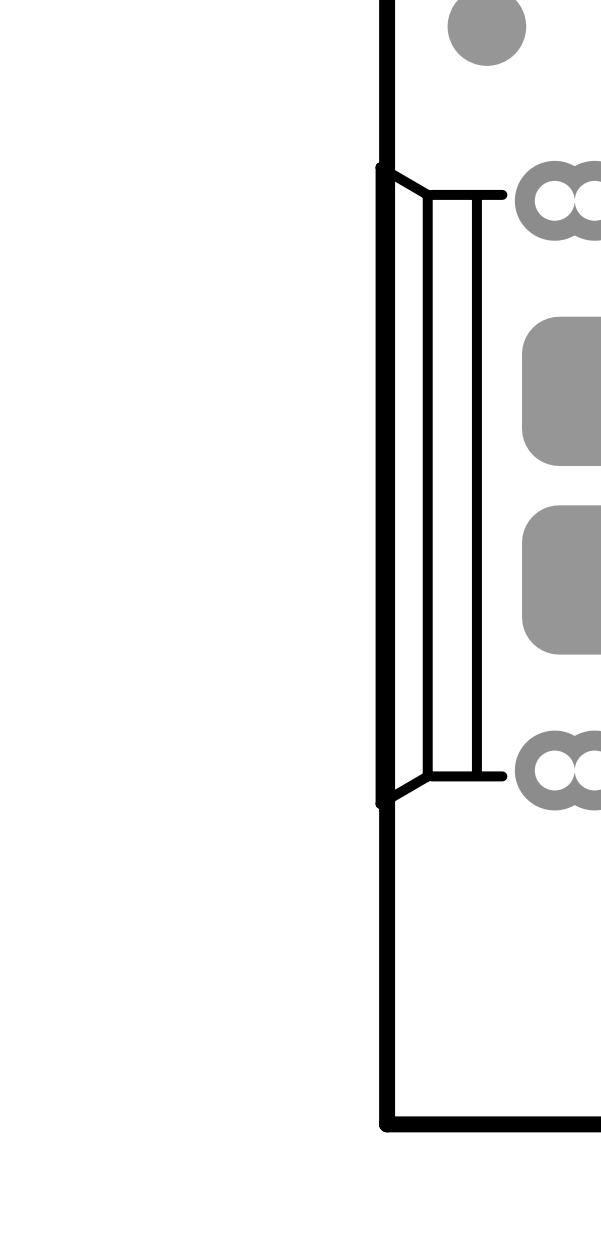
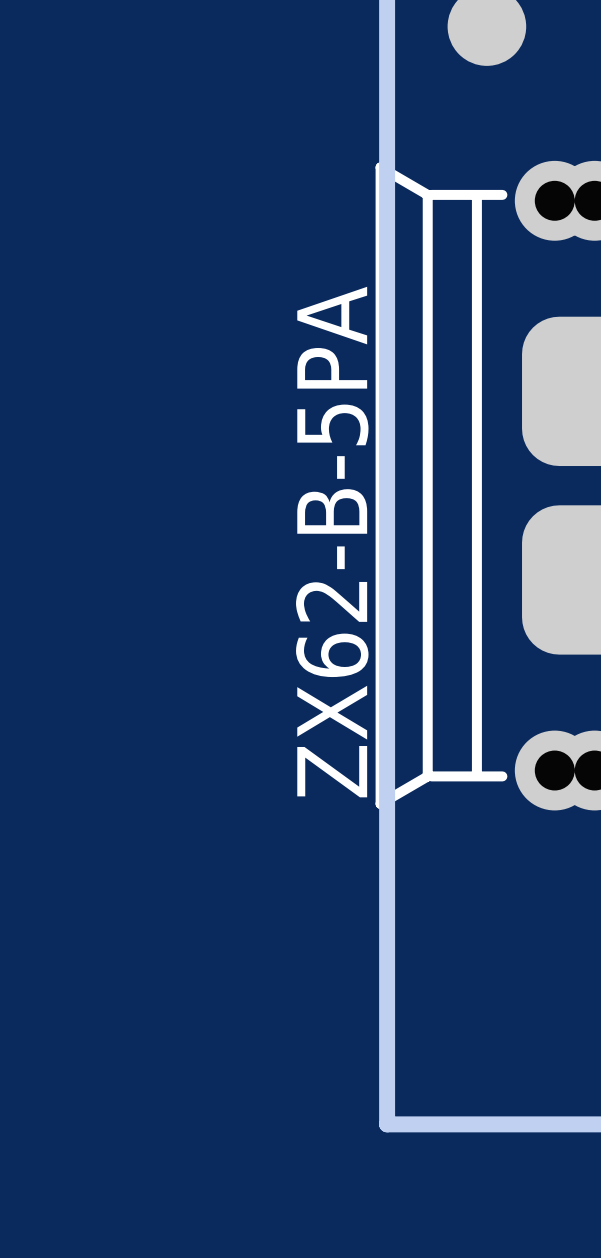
part value: none -> ZX62-B-5PA (332, 542)

